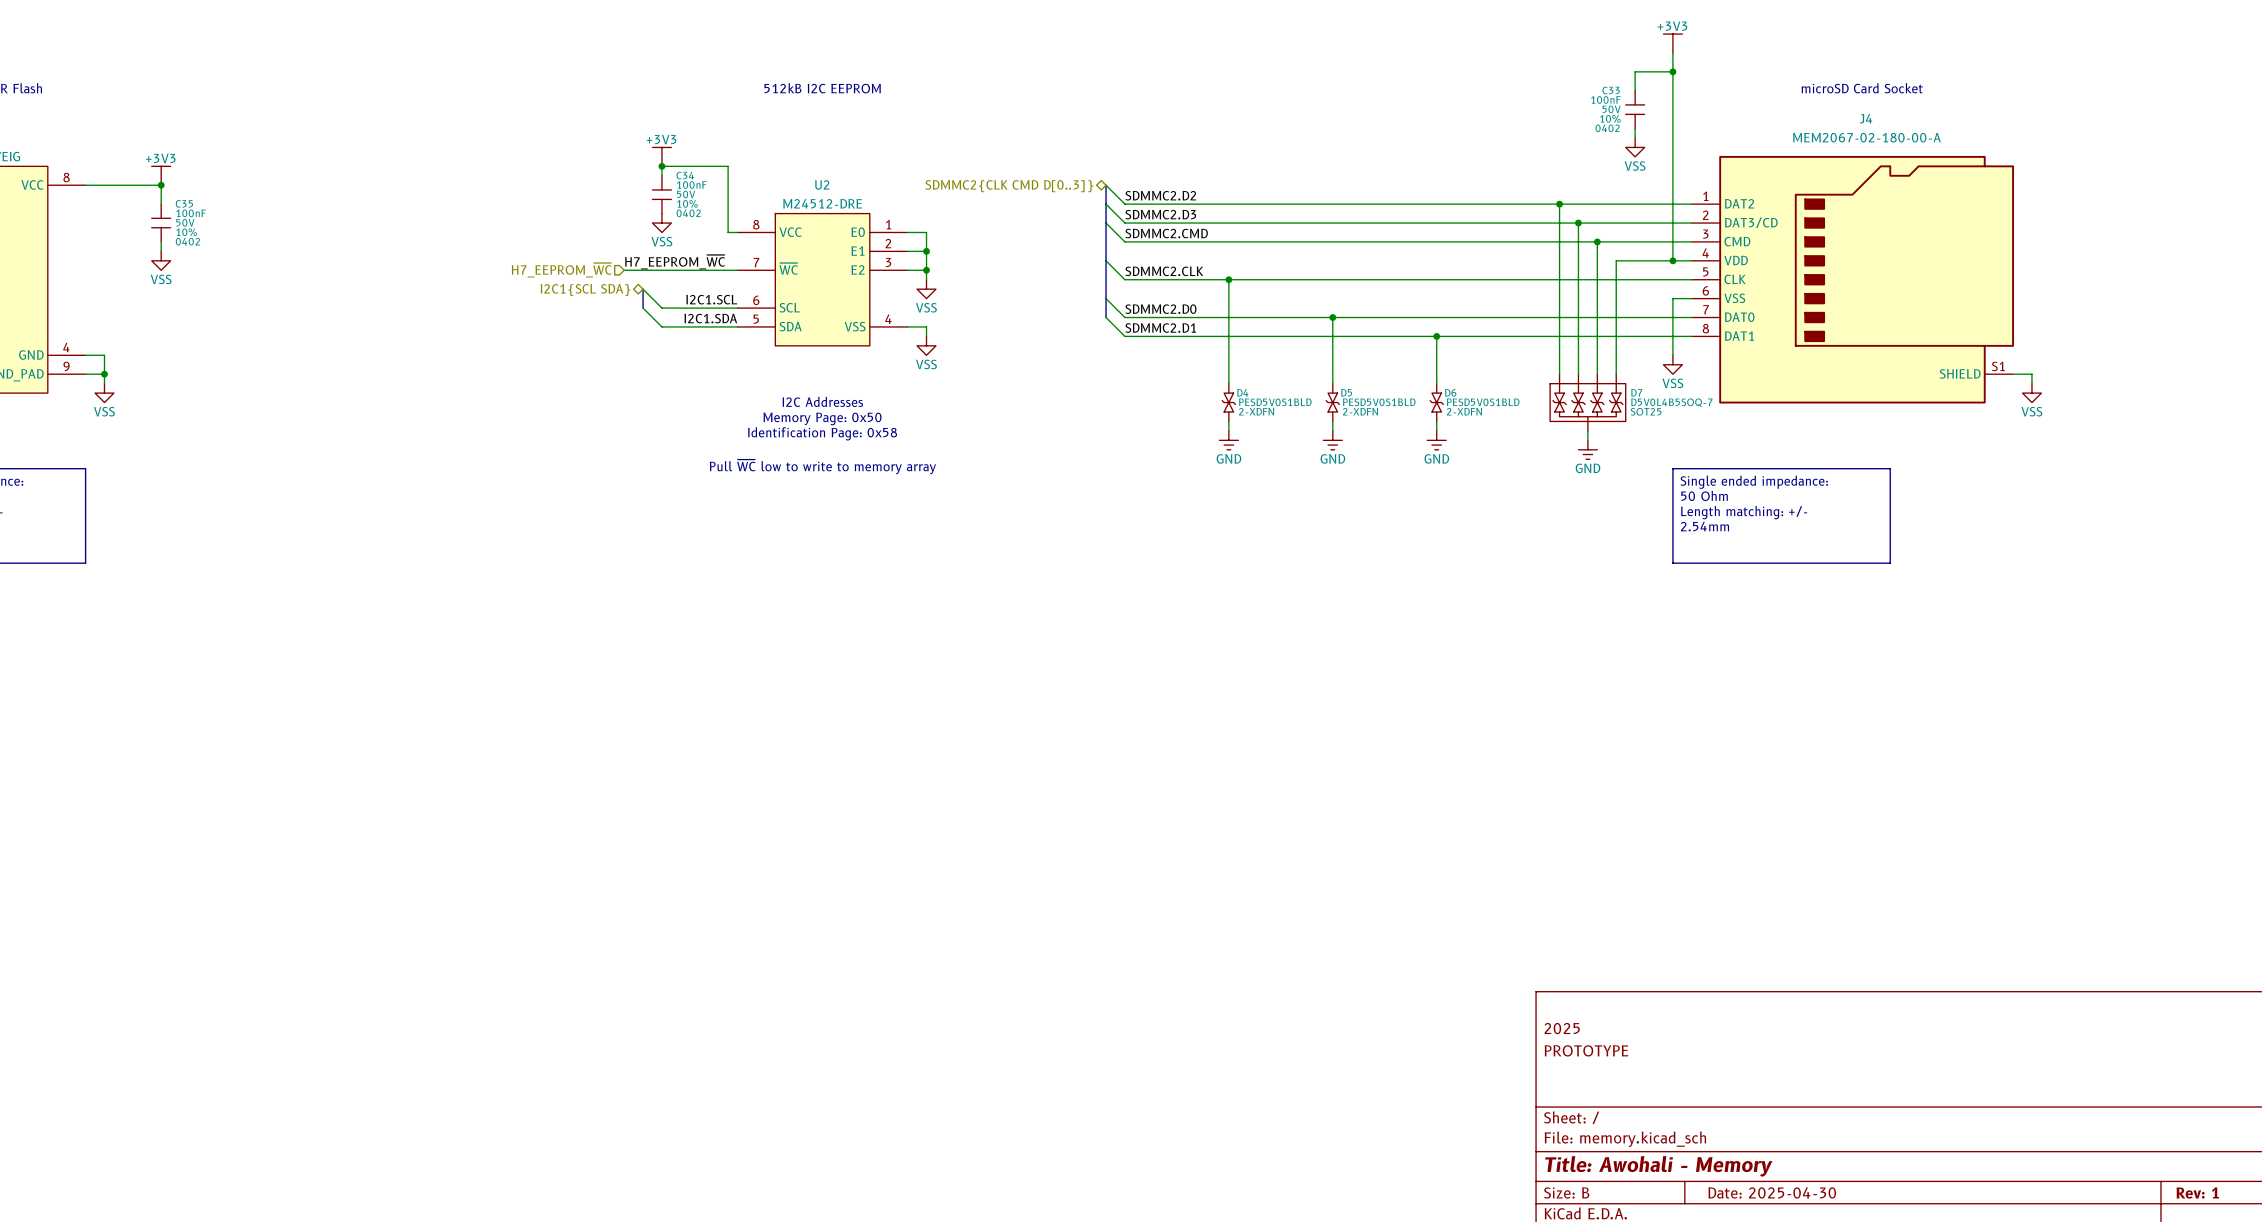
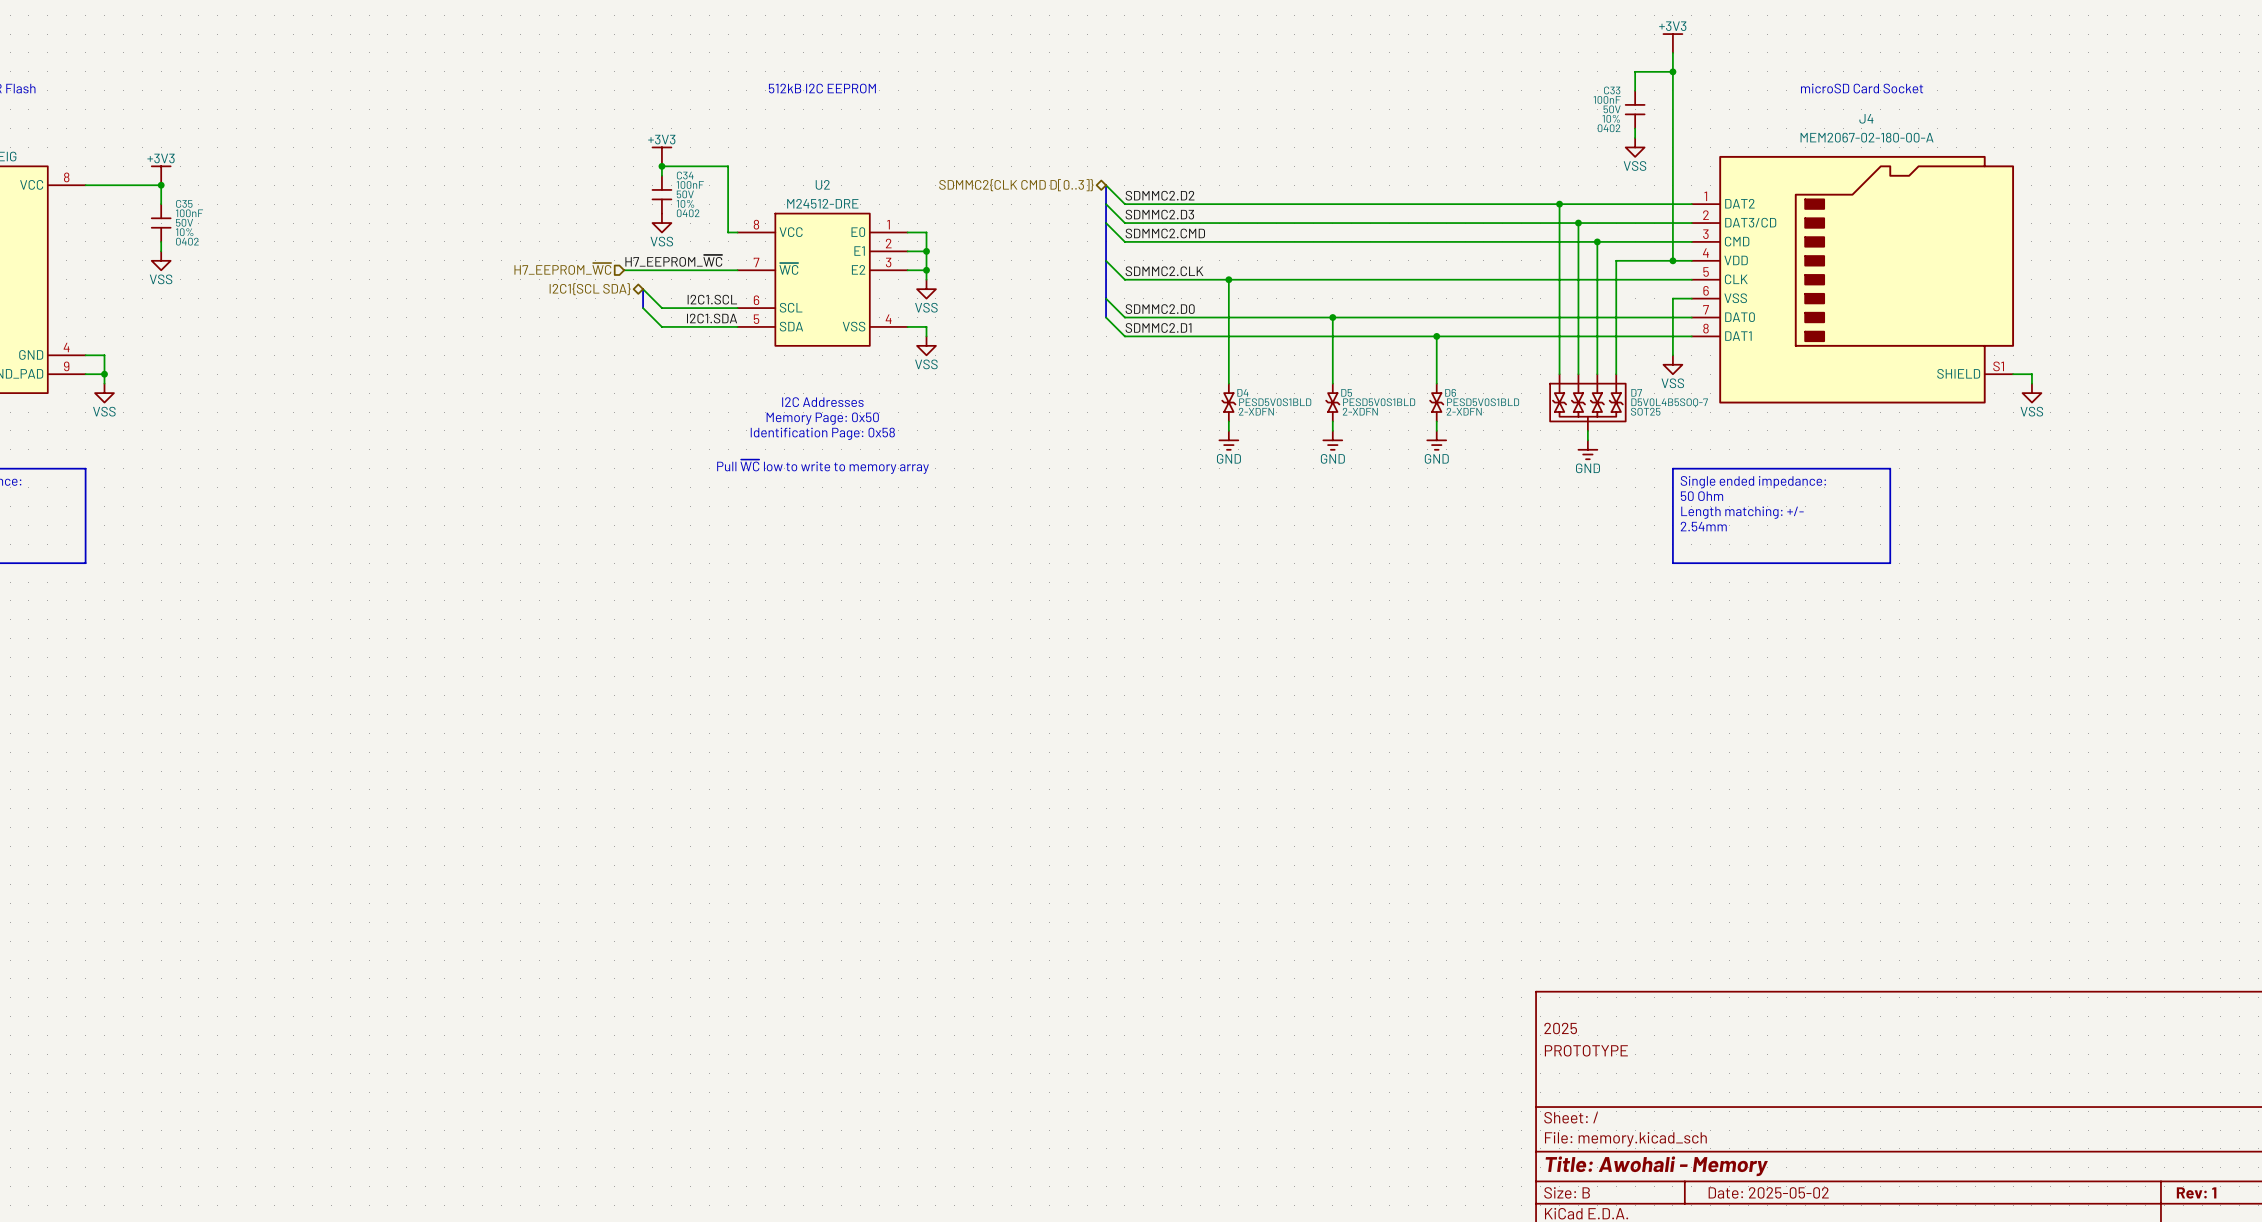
title block: Date: 2025-04-30 (1772, 1192) -> Date: 2025-05-02 (1768, 1192)

